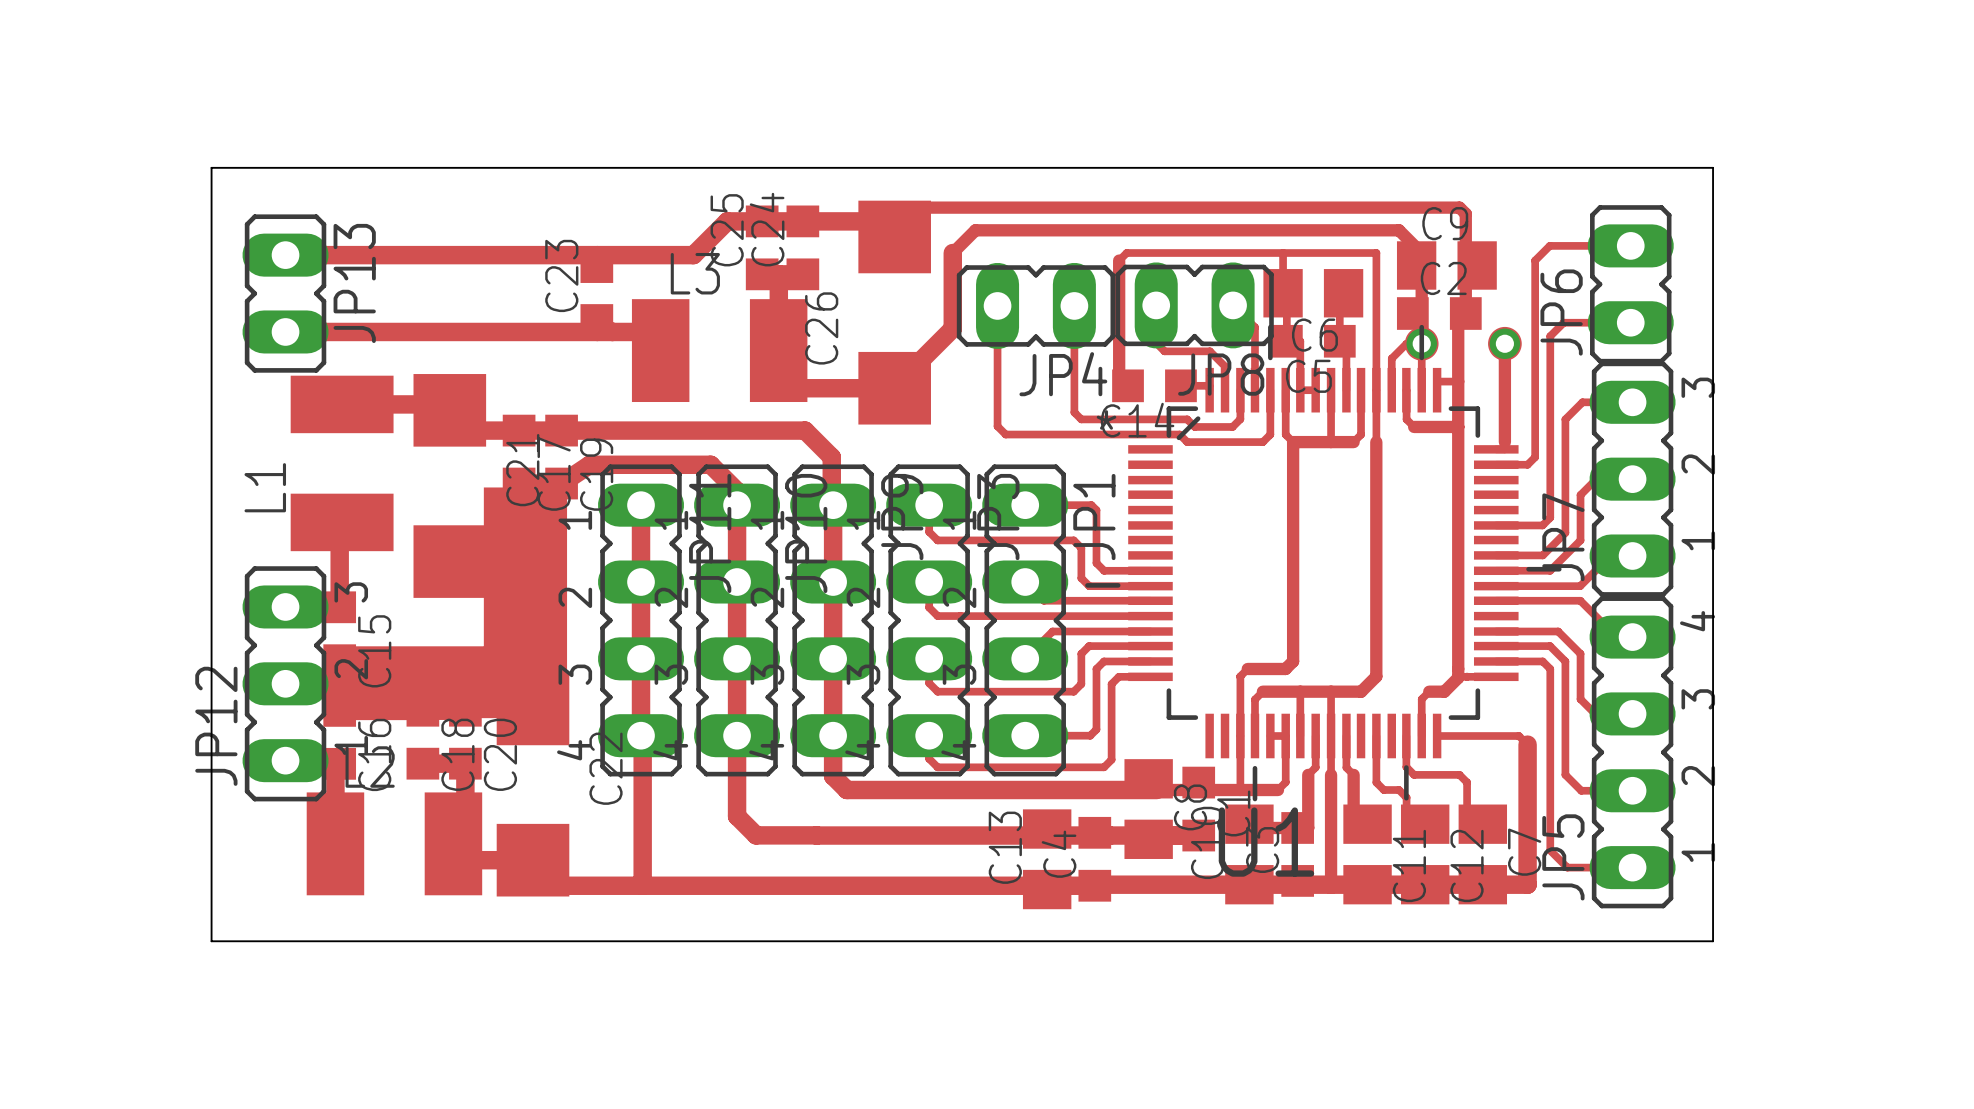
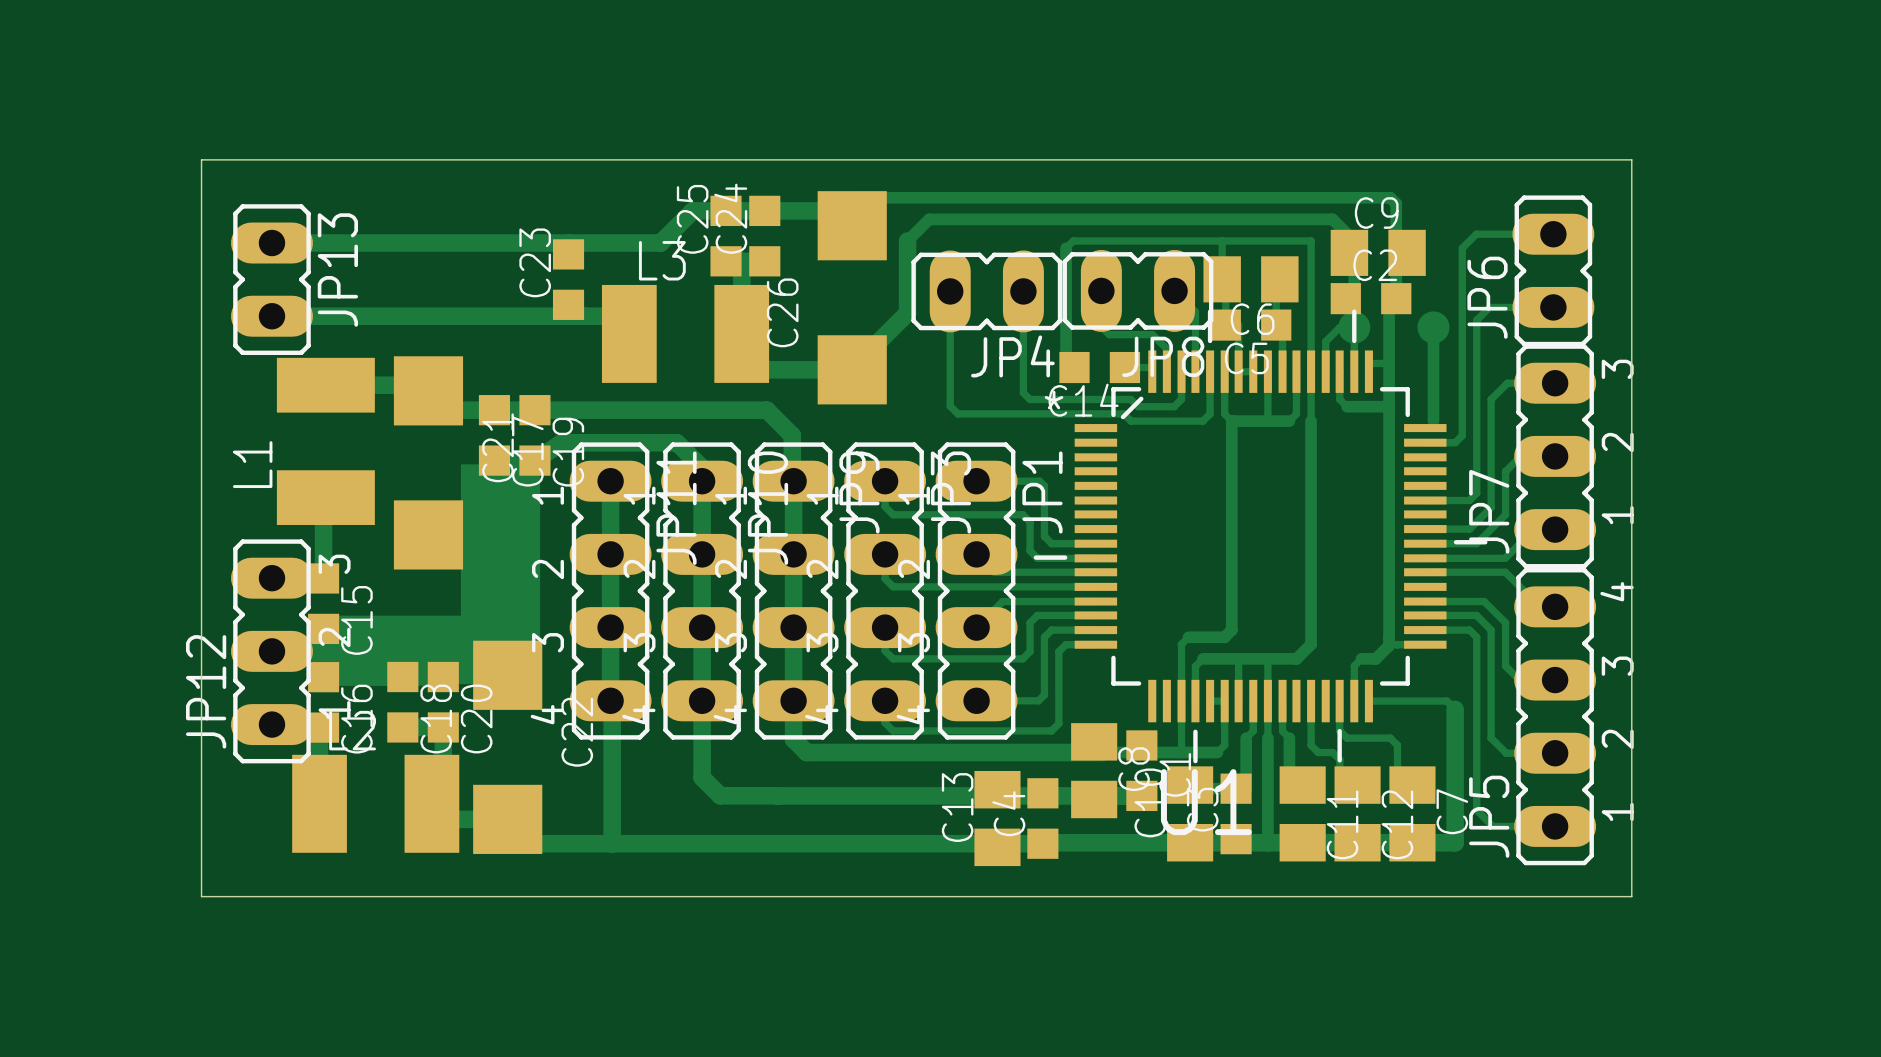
via: (1421, 343) -> none
via: (1504, 343) -> none

